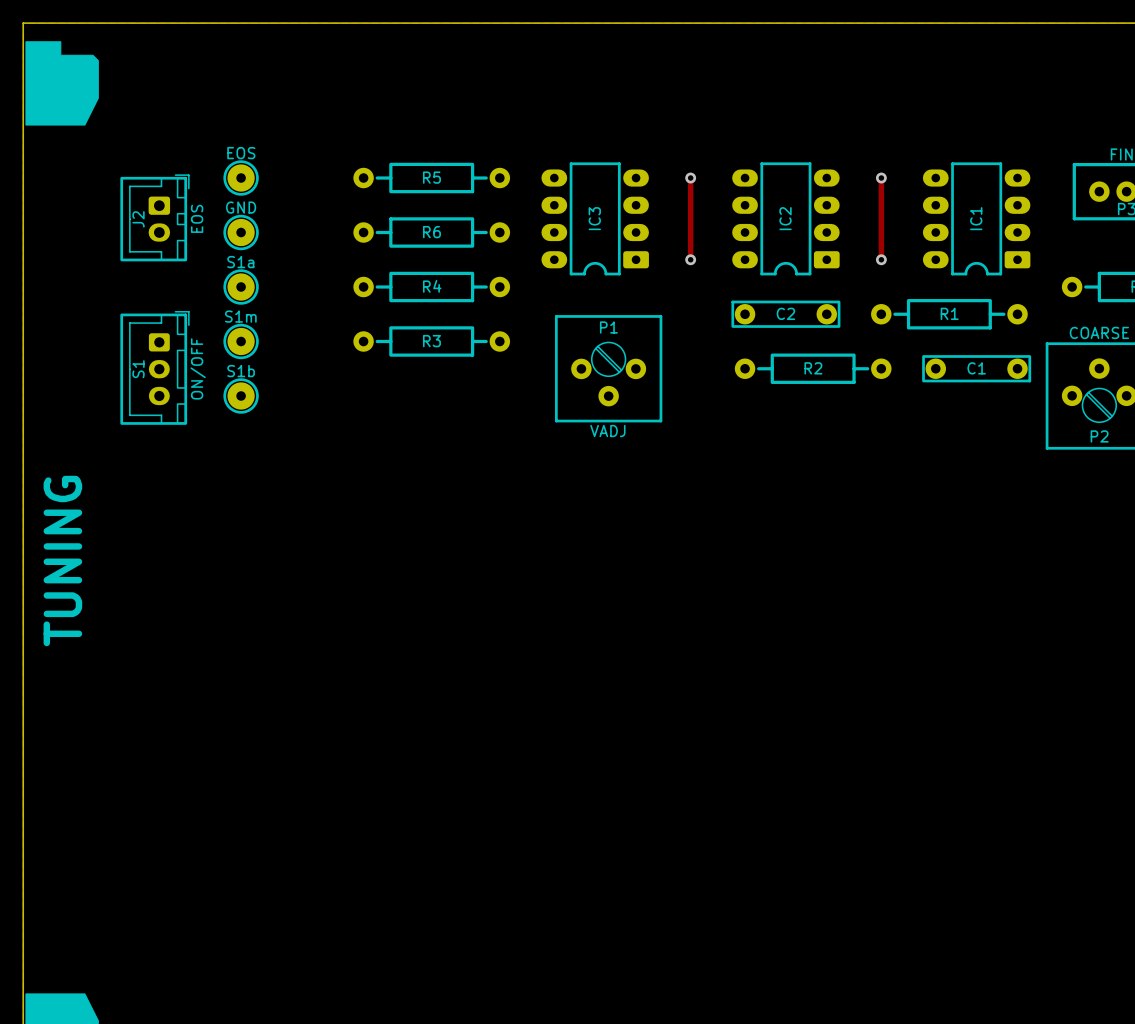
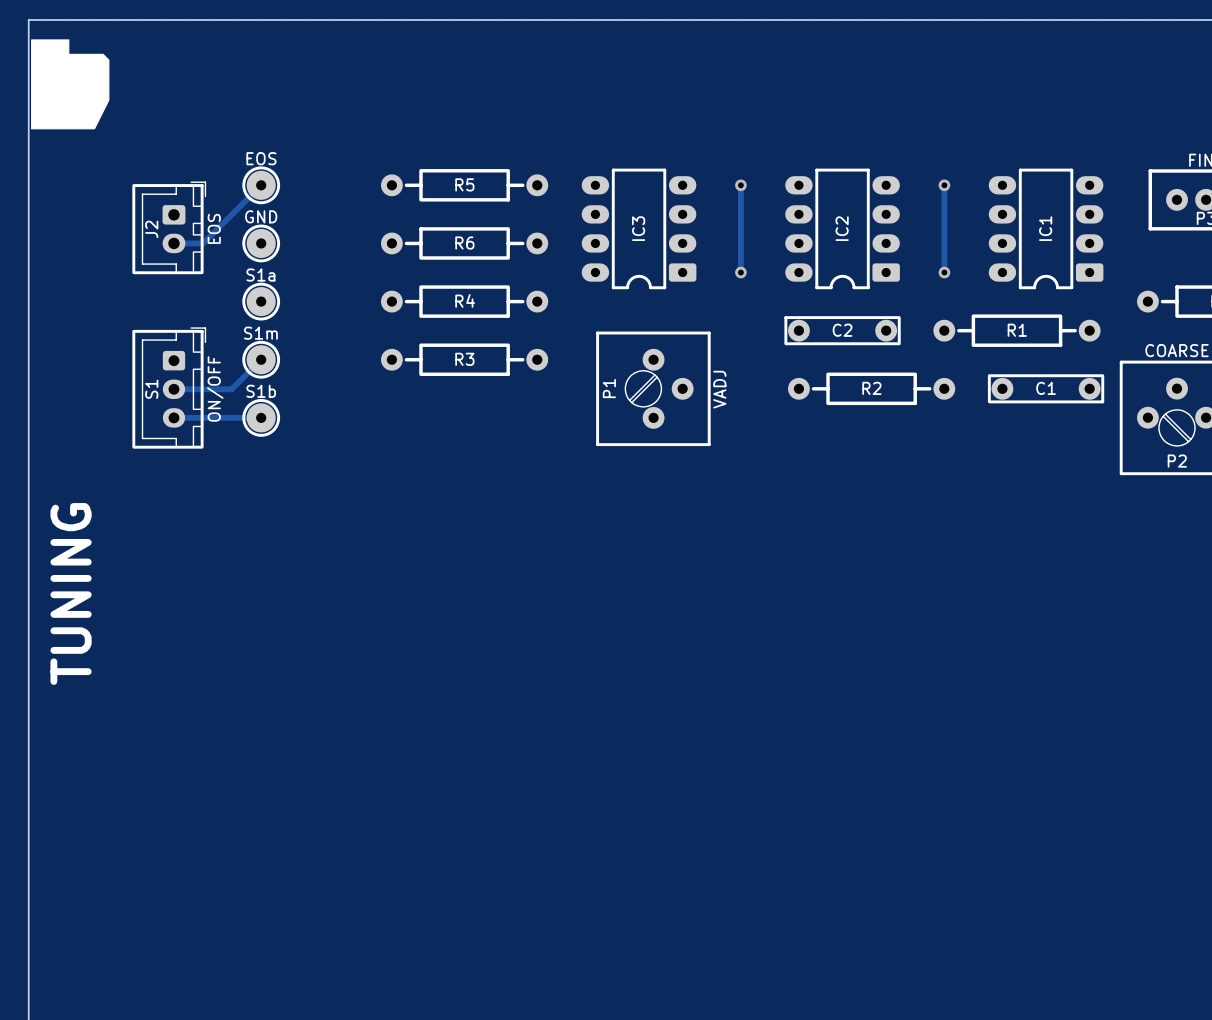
track: none -> (261, 185) (203, 243) (173, 243)
track: none -> (261, 359) (231, 389) (173, 389)
P1 rotation: 0° (608, 368) -> 90° counterclockwise (653, 388)
track: none -> (173, 417) (261, 417)

